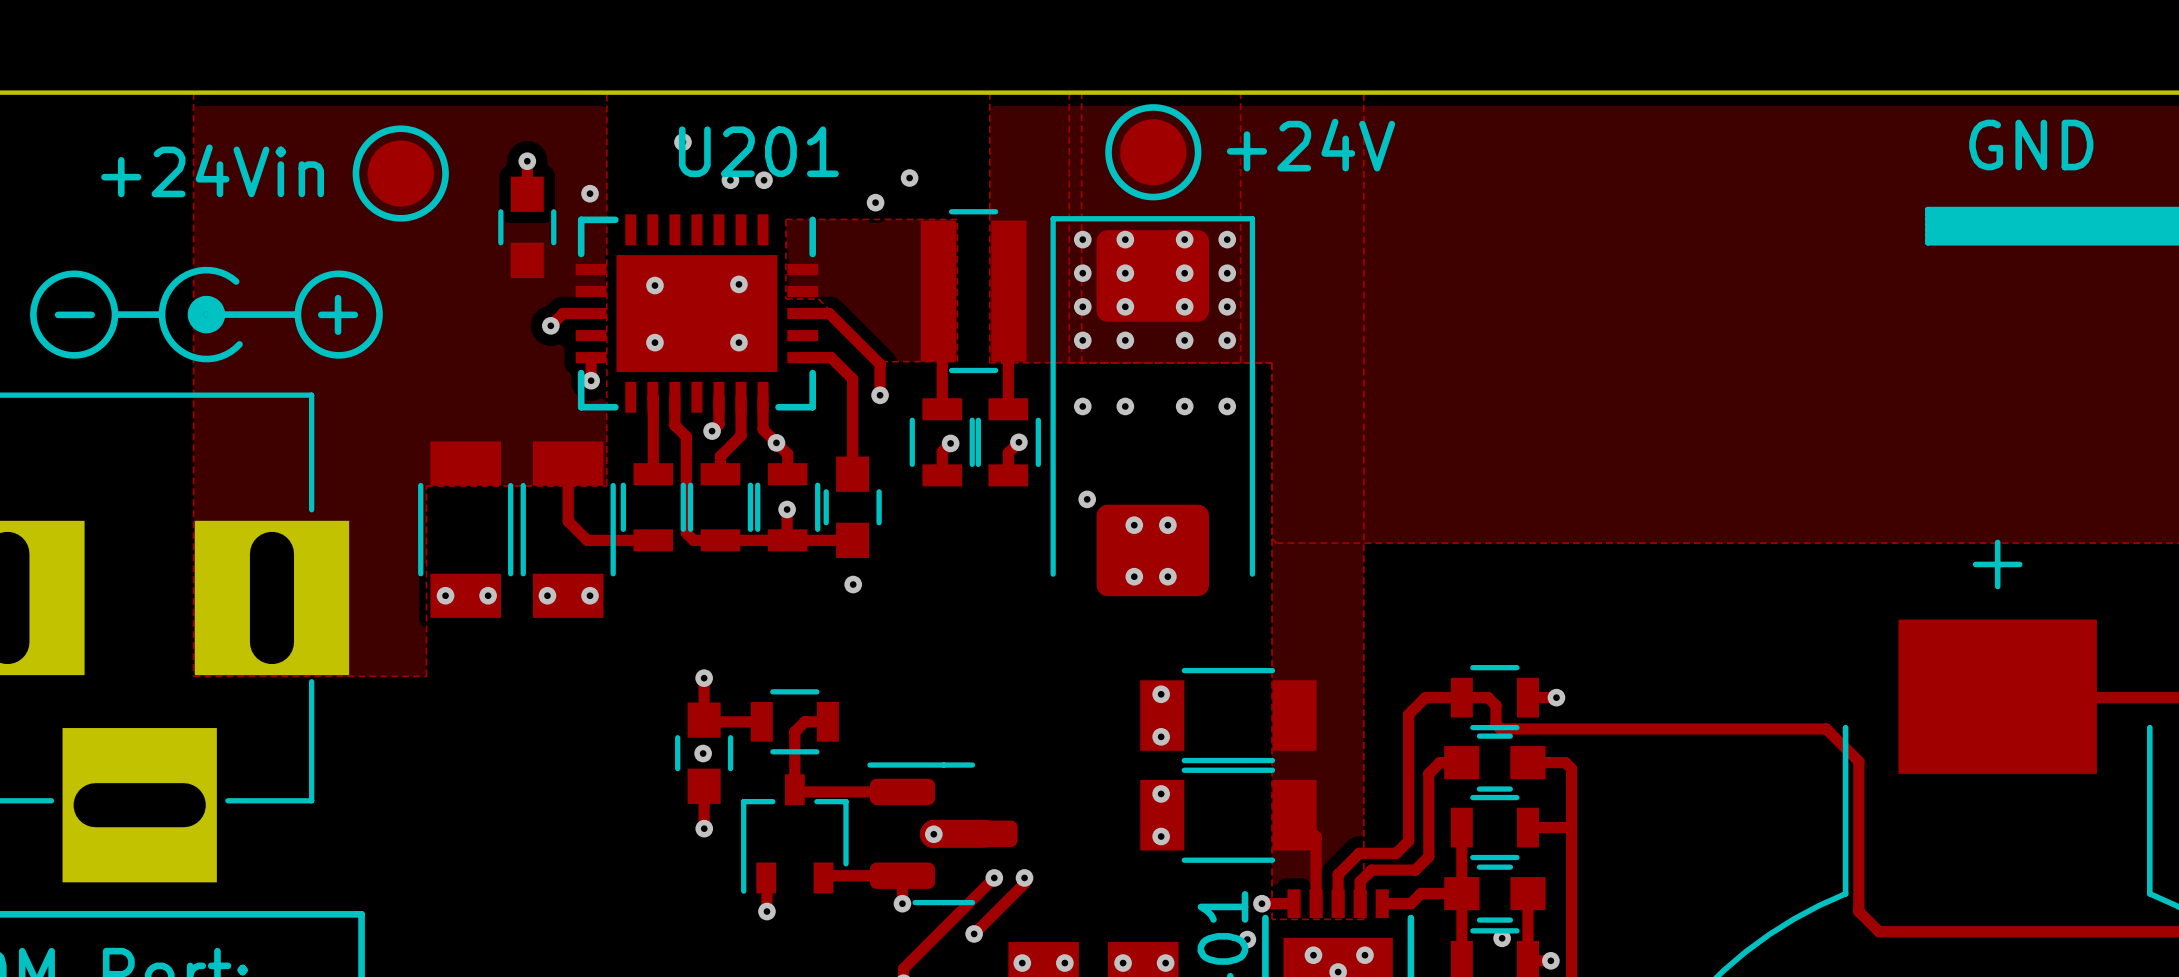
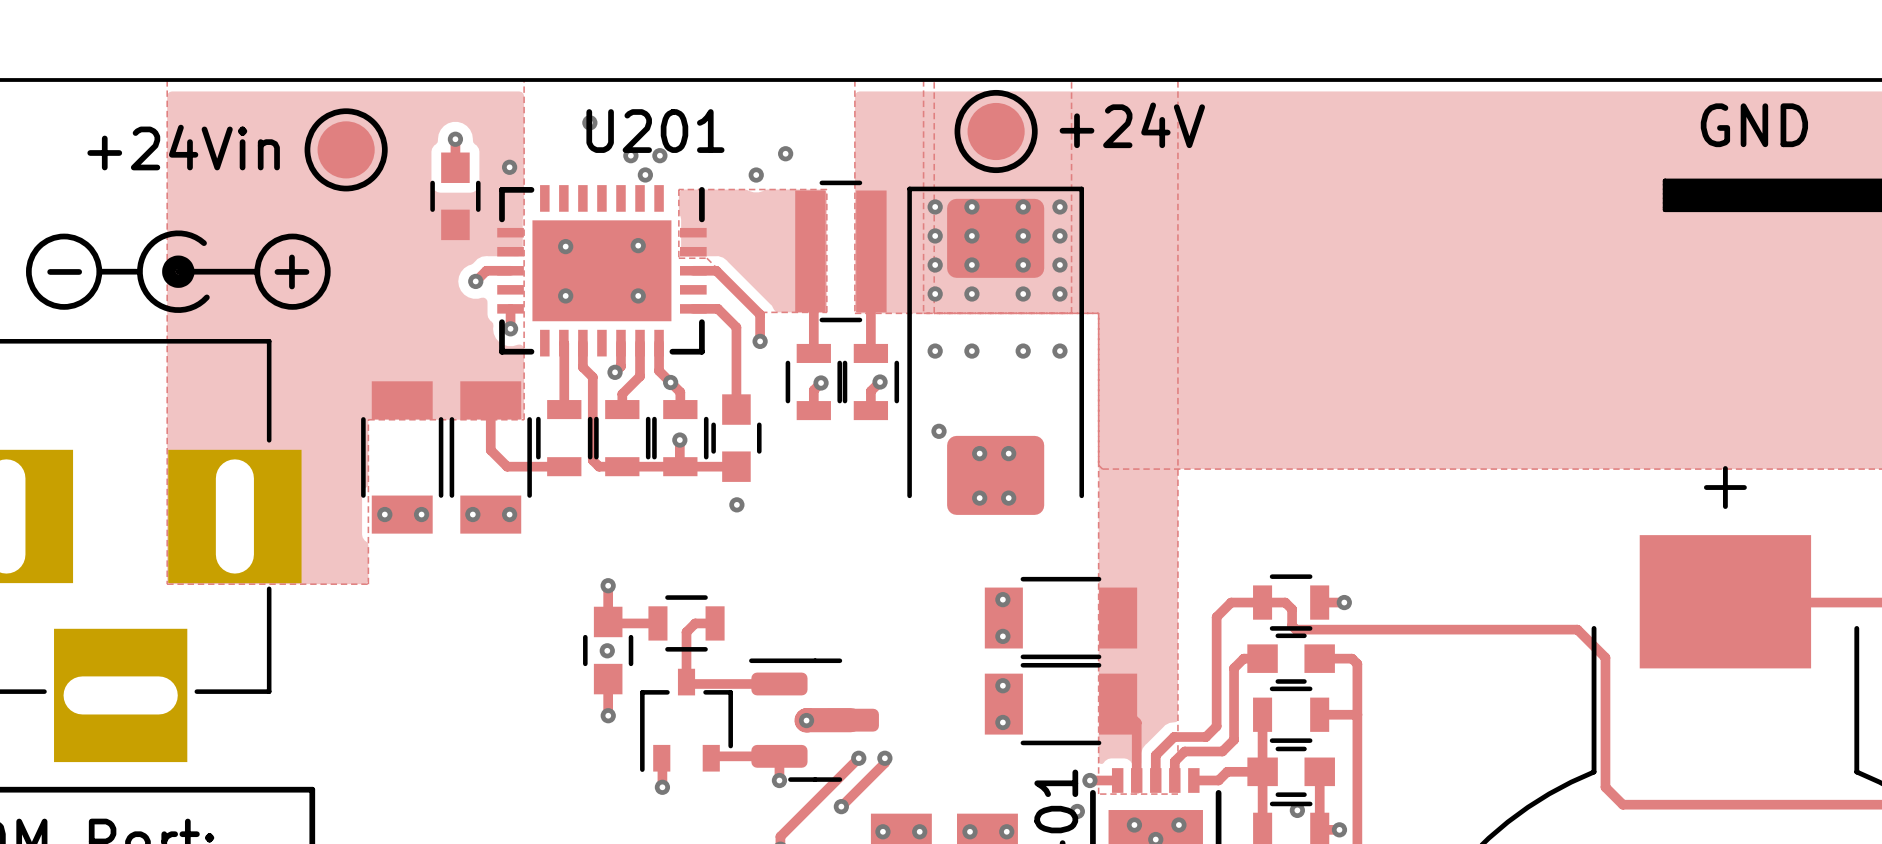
via: none -> (645, 174)

